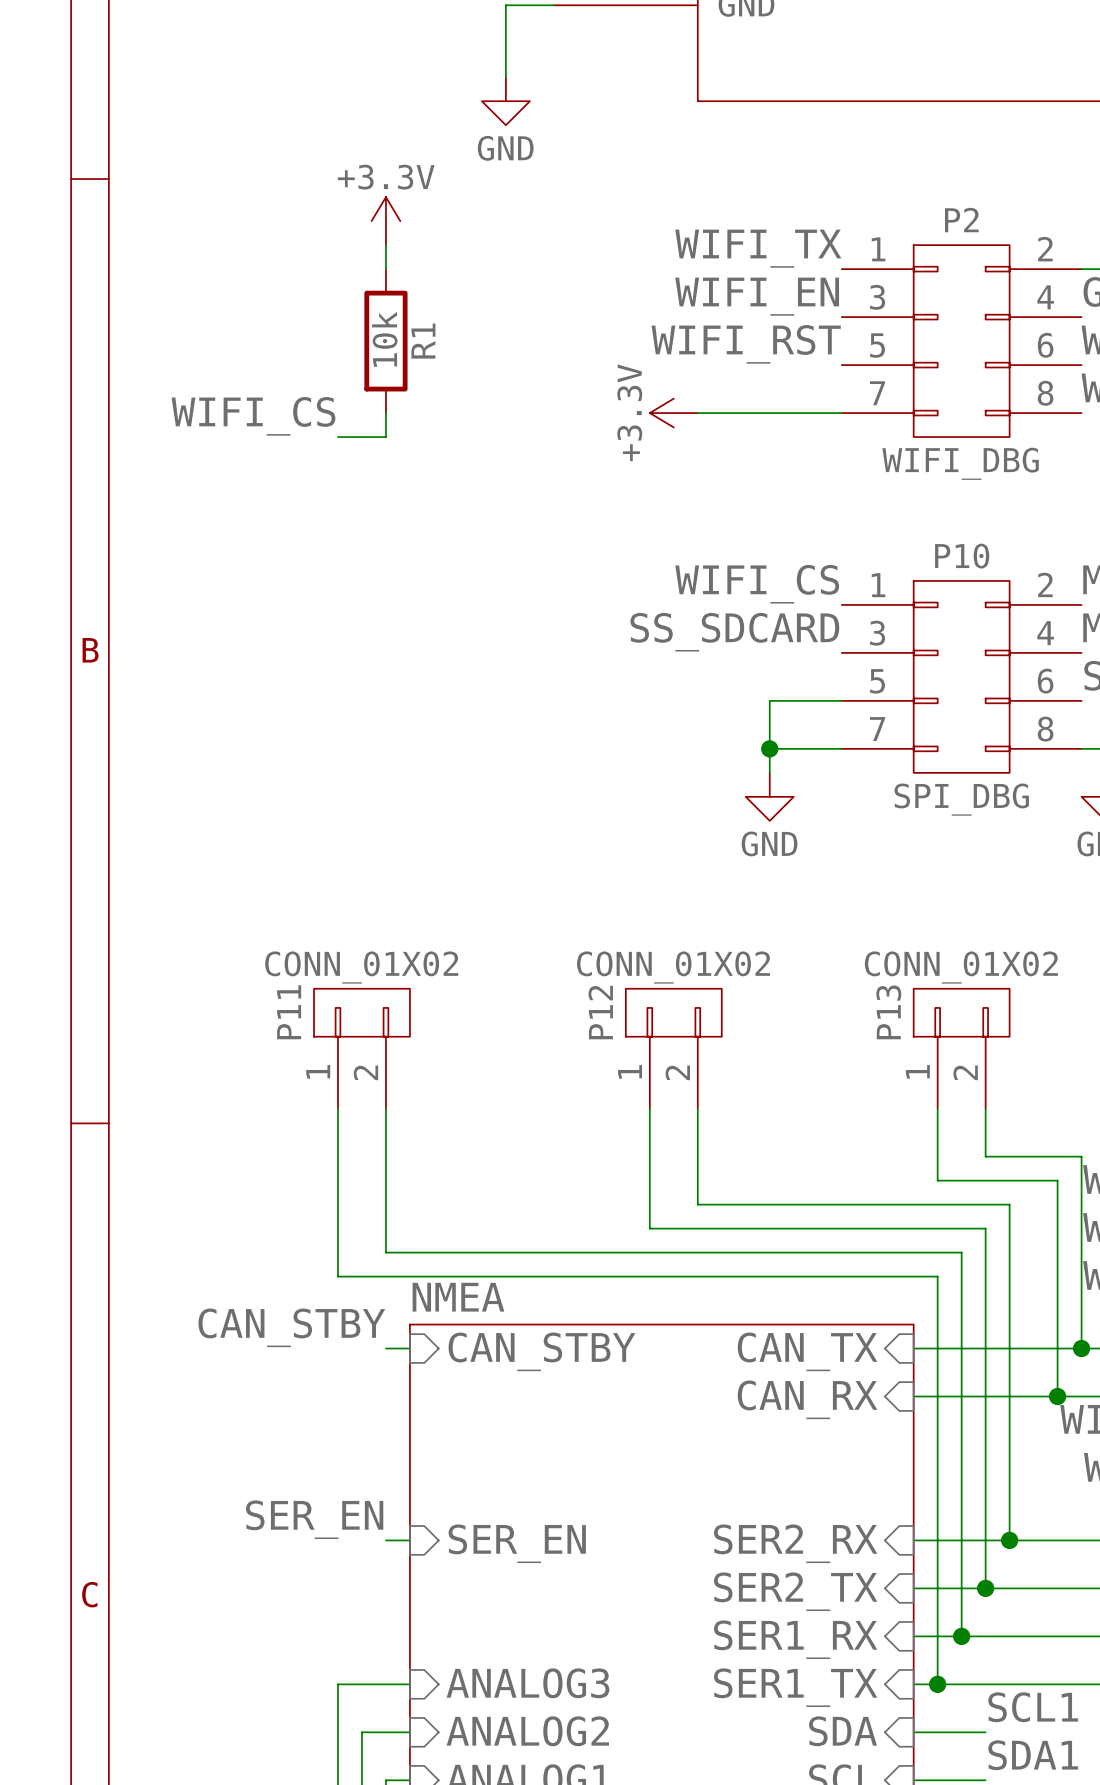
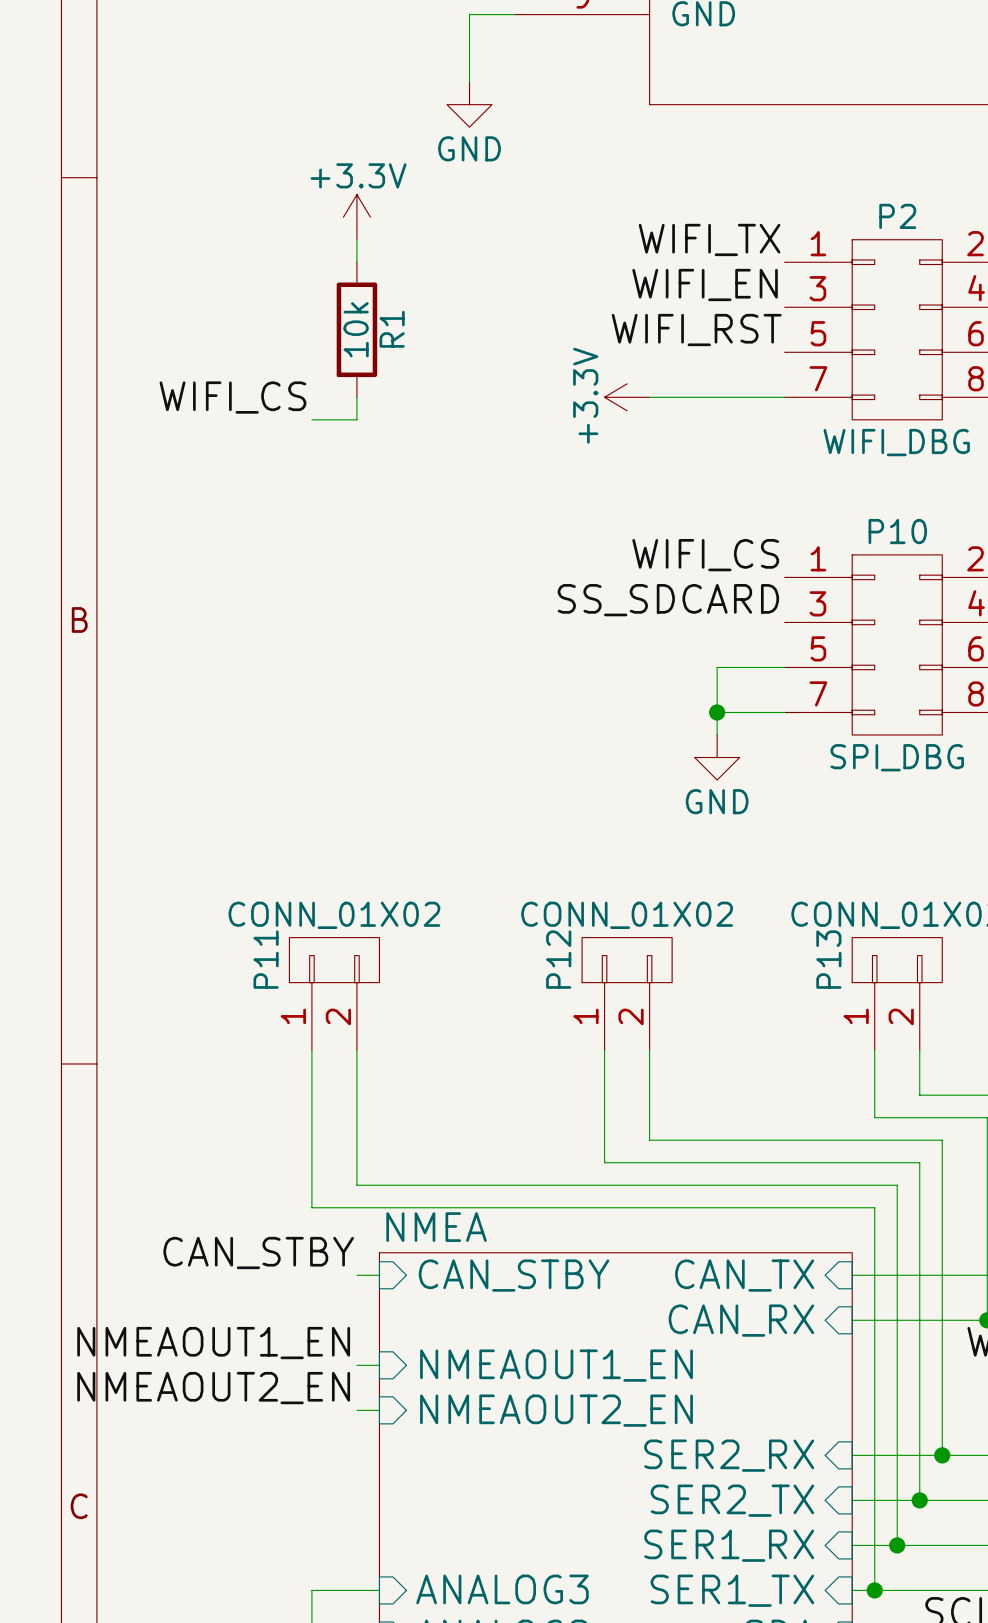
label: none -> NMEAOUT1_EN (213, 1343)
wire: none -> (356, 1365) (379, 1365)
sheet pin: none -> NMEAOUT1_EN (556, 1365)
label: none -> NMEAOUT2_EN (213, 1388)
sheet pin: none -> NMEAOUT2_EN (556, 1410)
label: SER_EN (314, 1519) -> none
wire: (385, 1540) (409, 1540) -> (356, 1410) (379, 1410)
sheet pin: SER_EN (517, 1543) -> none

